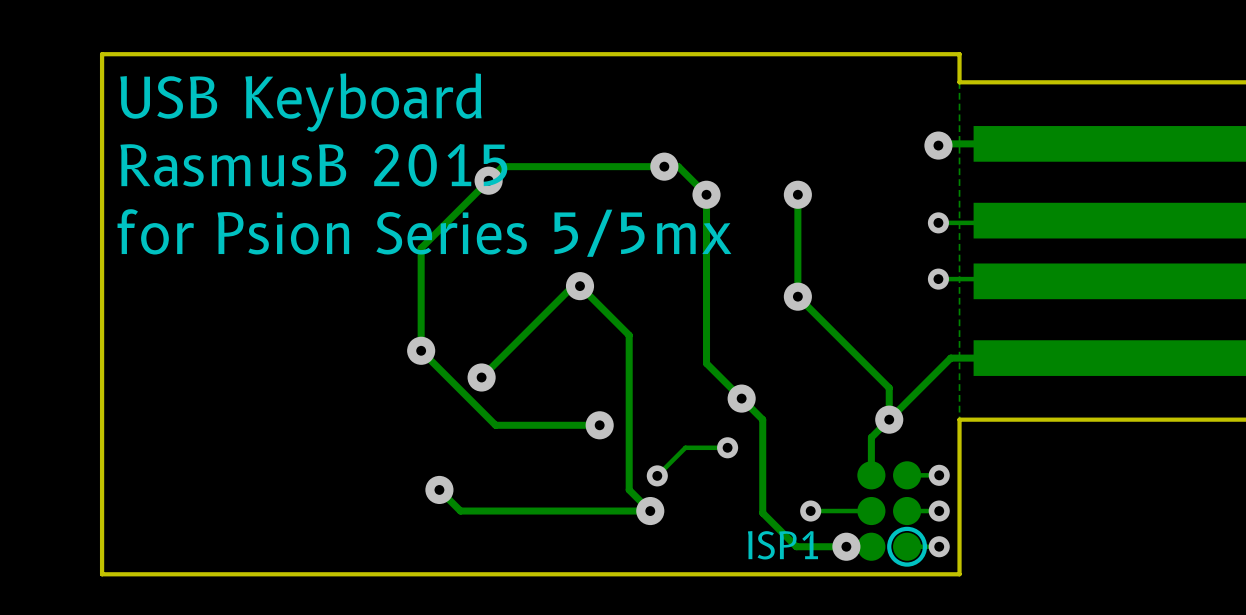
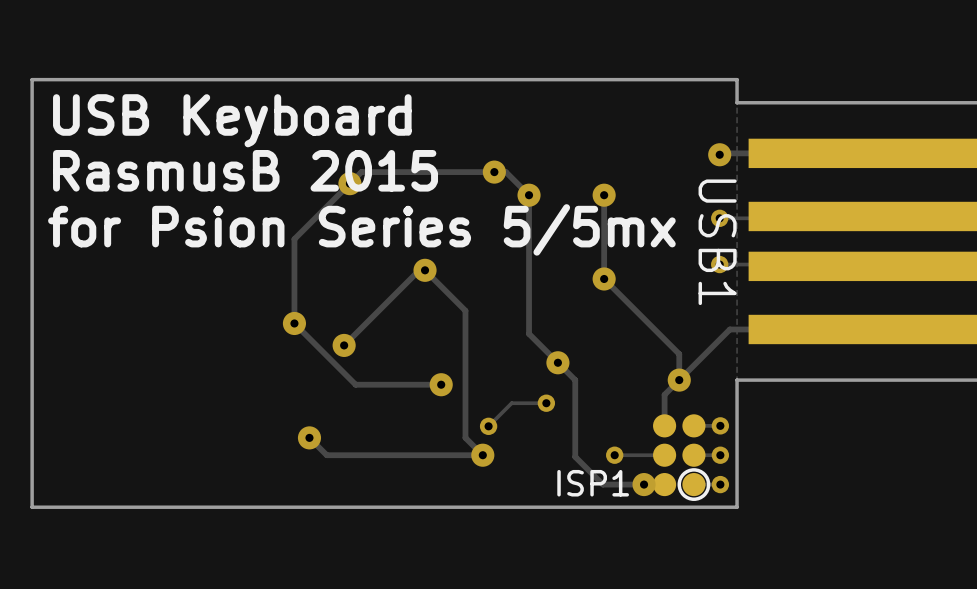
USB1 name: none -> USB1 (717, 242)

